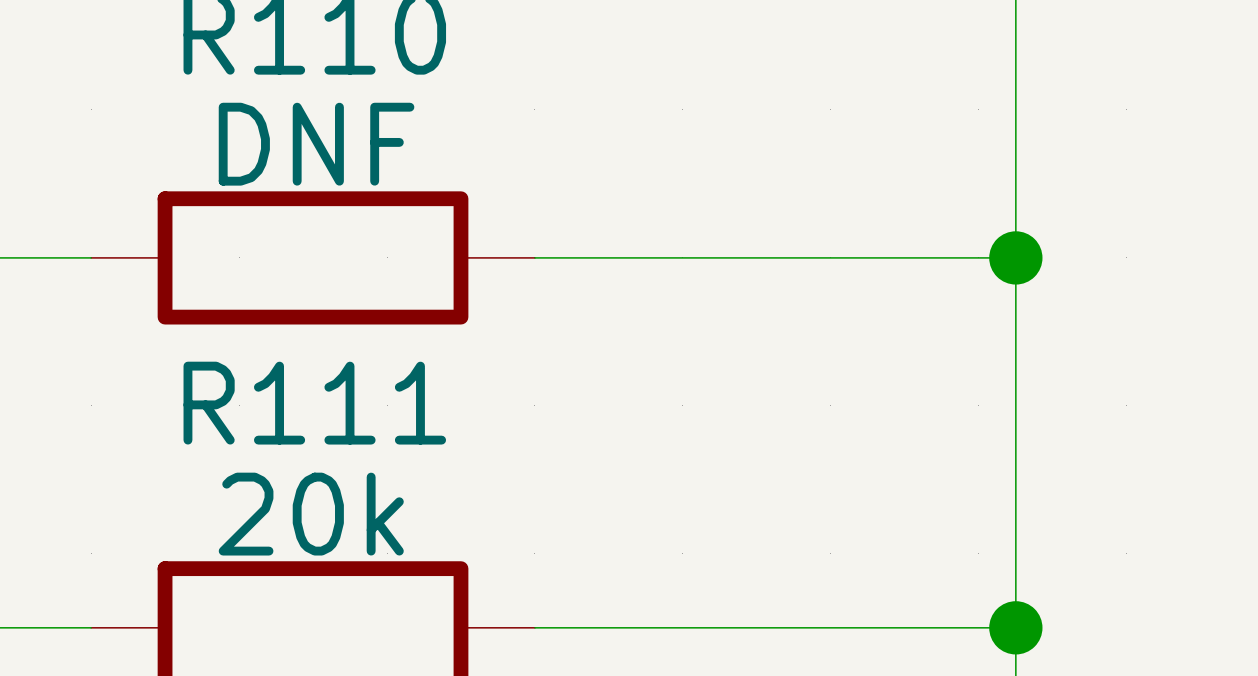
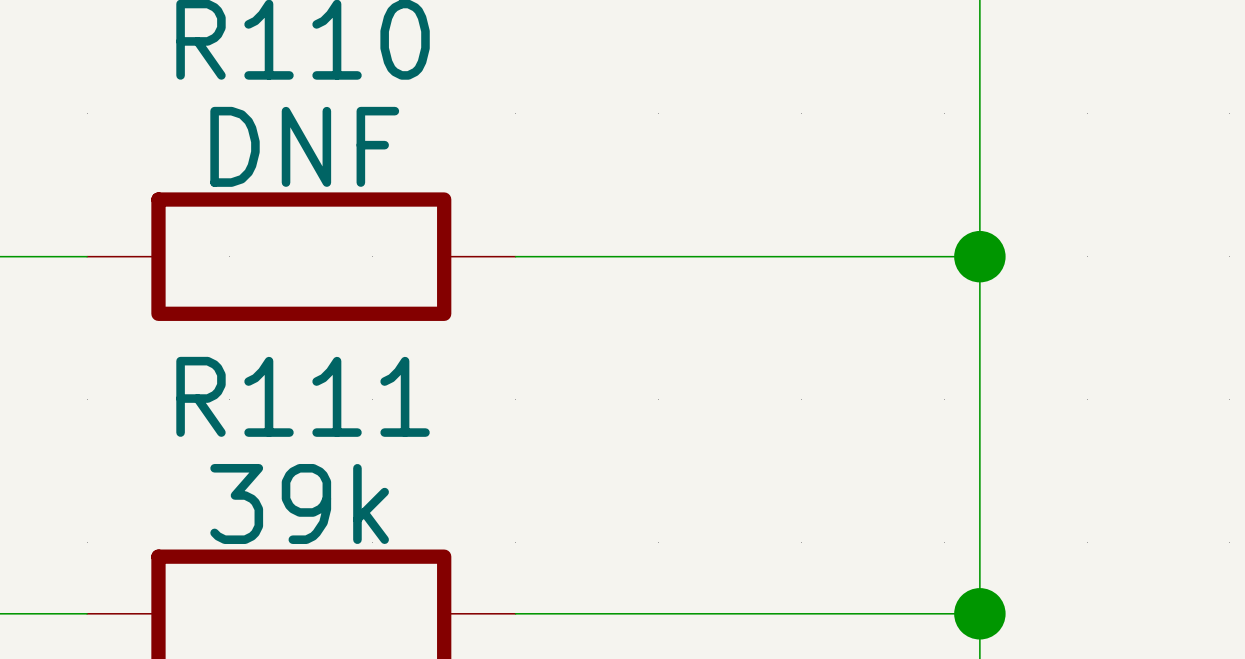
R111 value: 20k (311, 514) -> 39k (299, 503)

